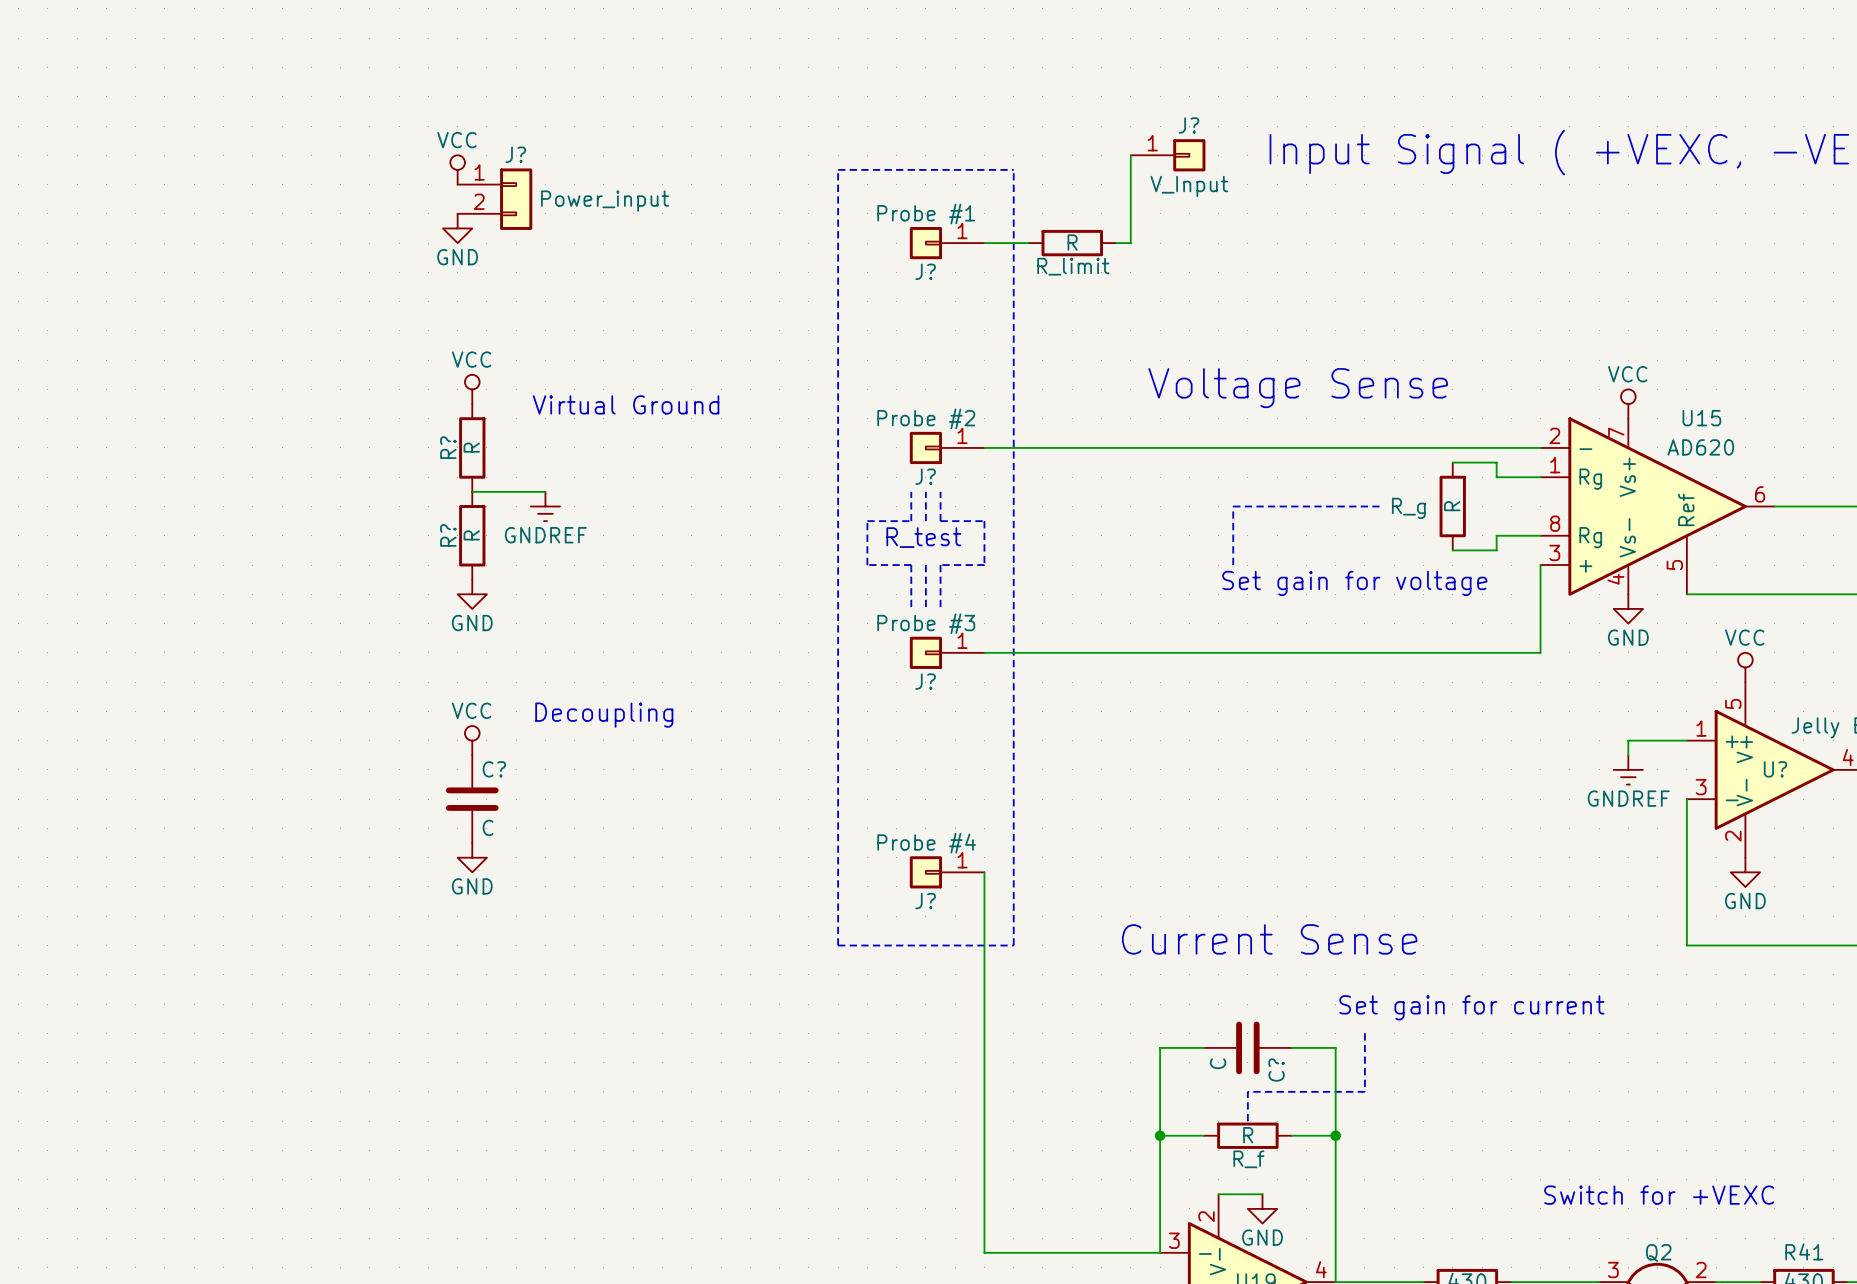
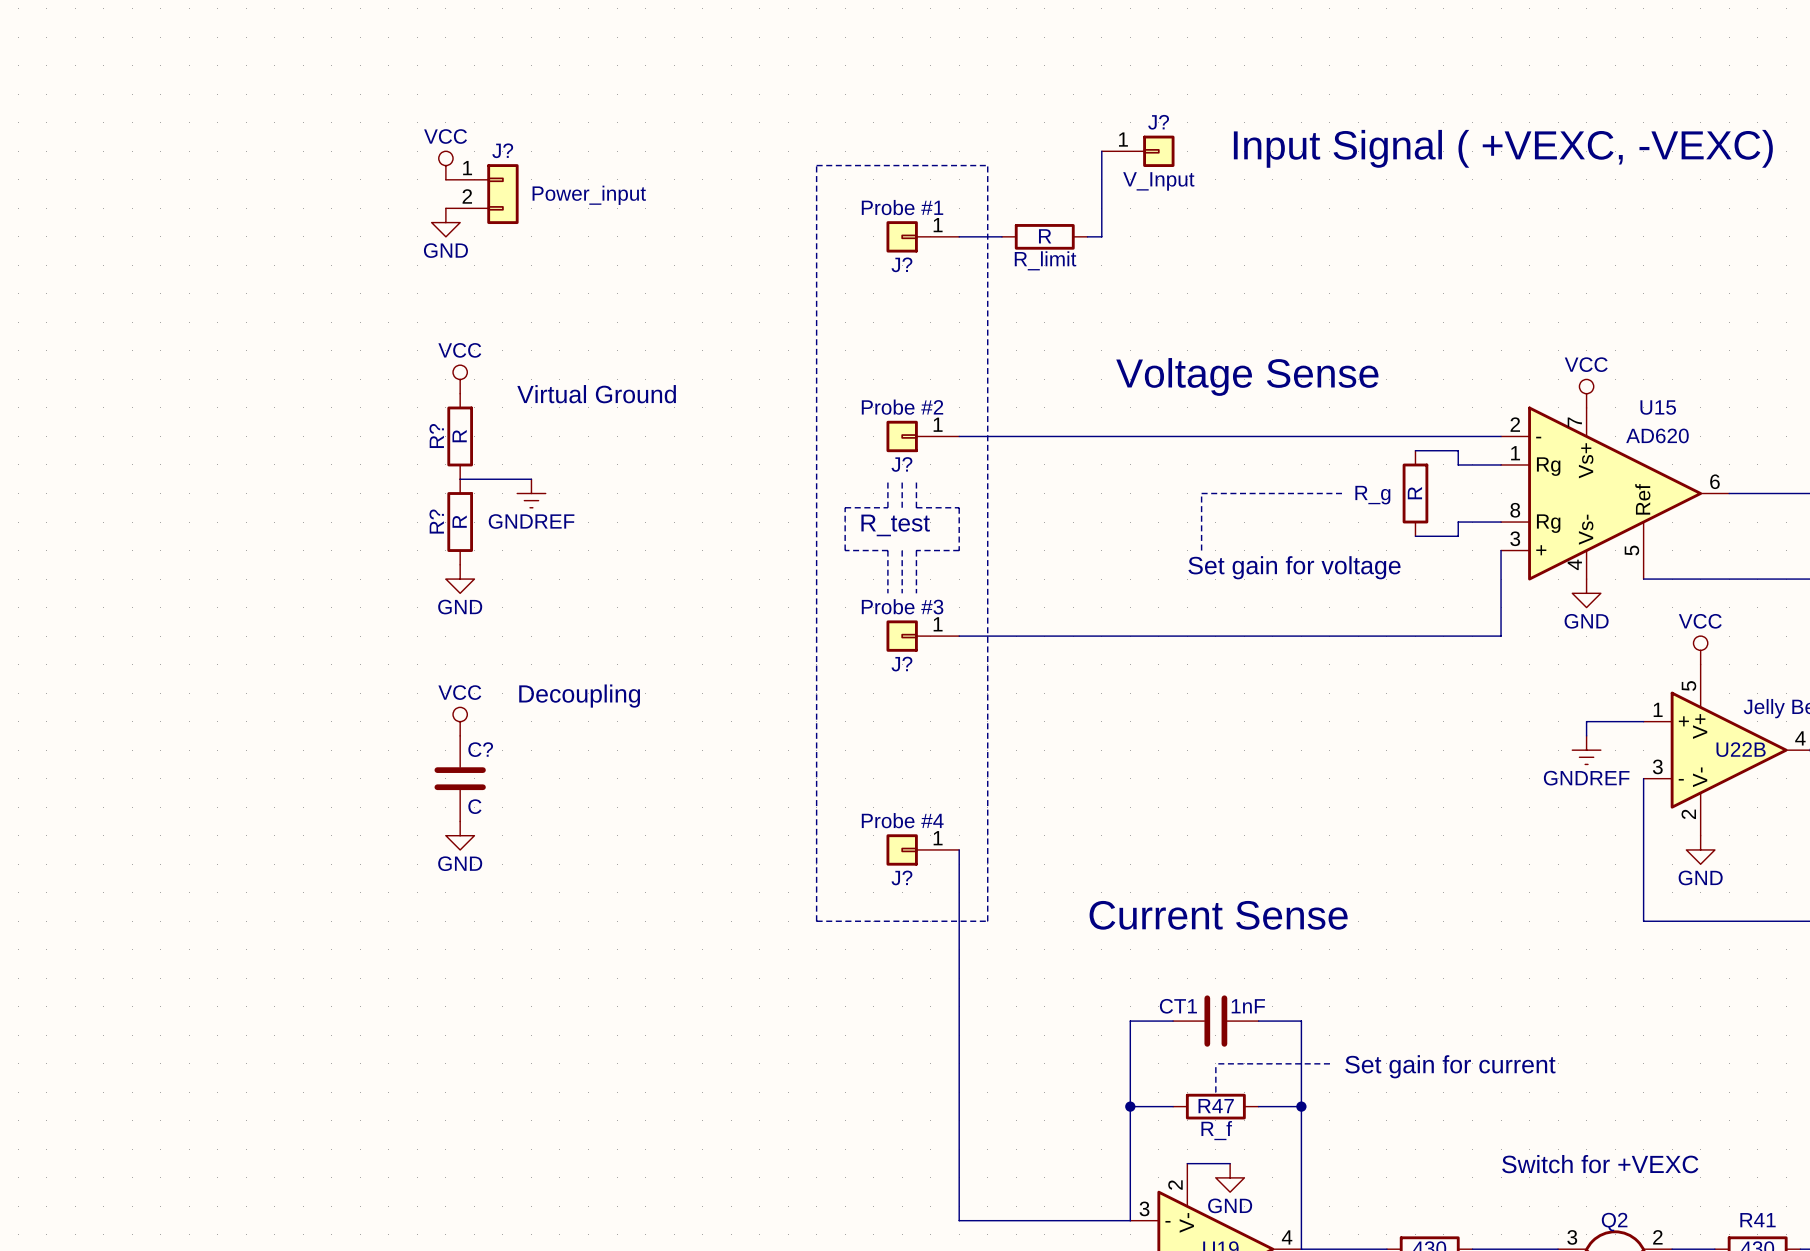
U? name: U? (1775, 769) -> U22B (1741, 749)
text position: Set gain for current (1471, 1007) -> Set gain for current (1450, 1066)
line: (1364, 1033) (1364, 1091) -> none
C? value: C (1218, 1063) -> 1nF (1248, 1006)
C? name: C? (1276, 1070) -> CT1 (1178, 1006)
R_f value: R (1248, 1135) -> R47 (1216, 1106)

